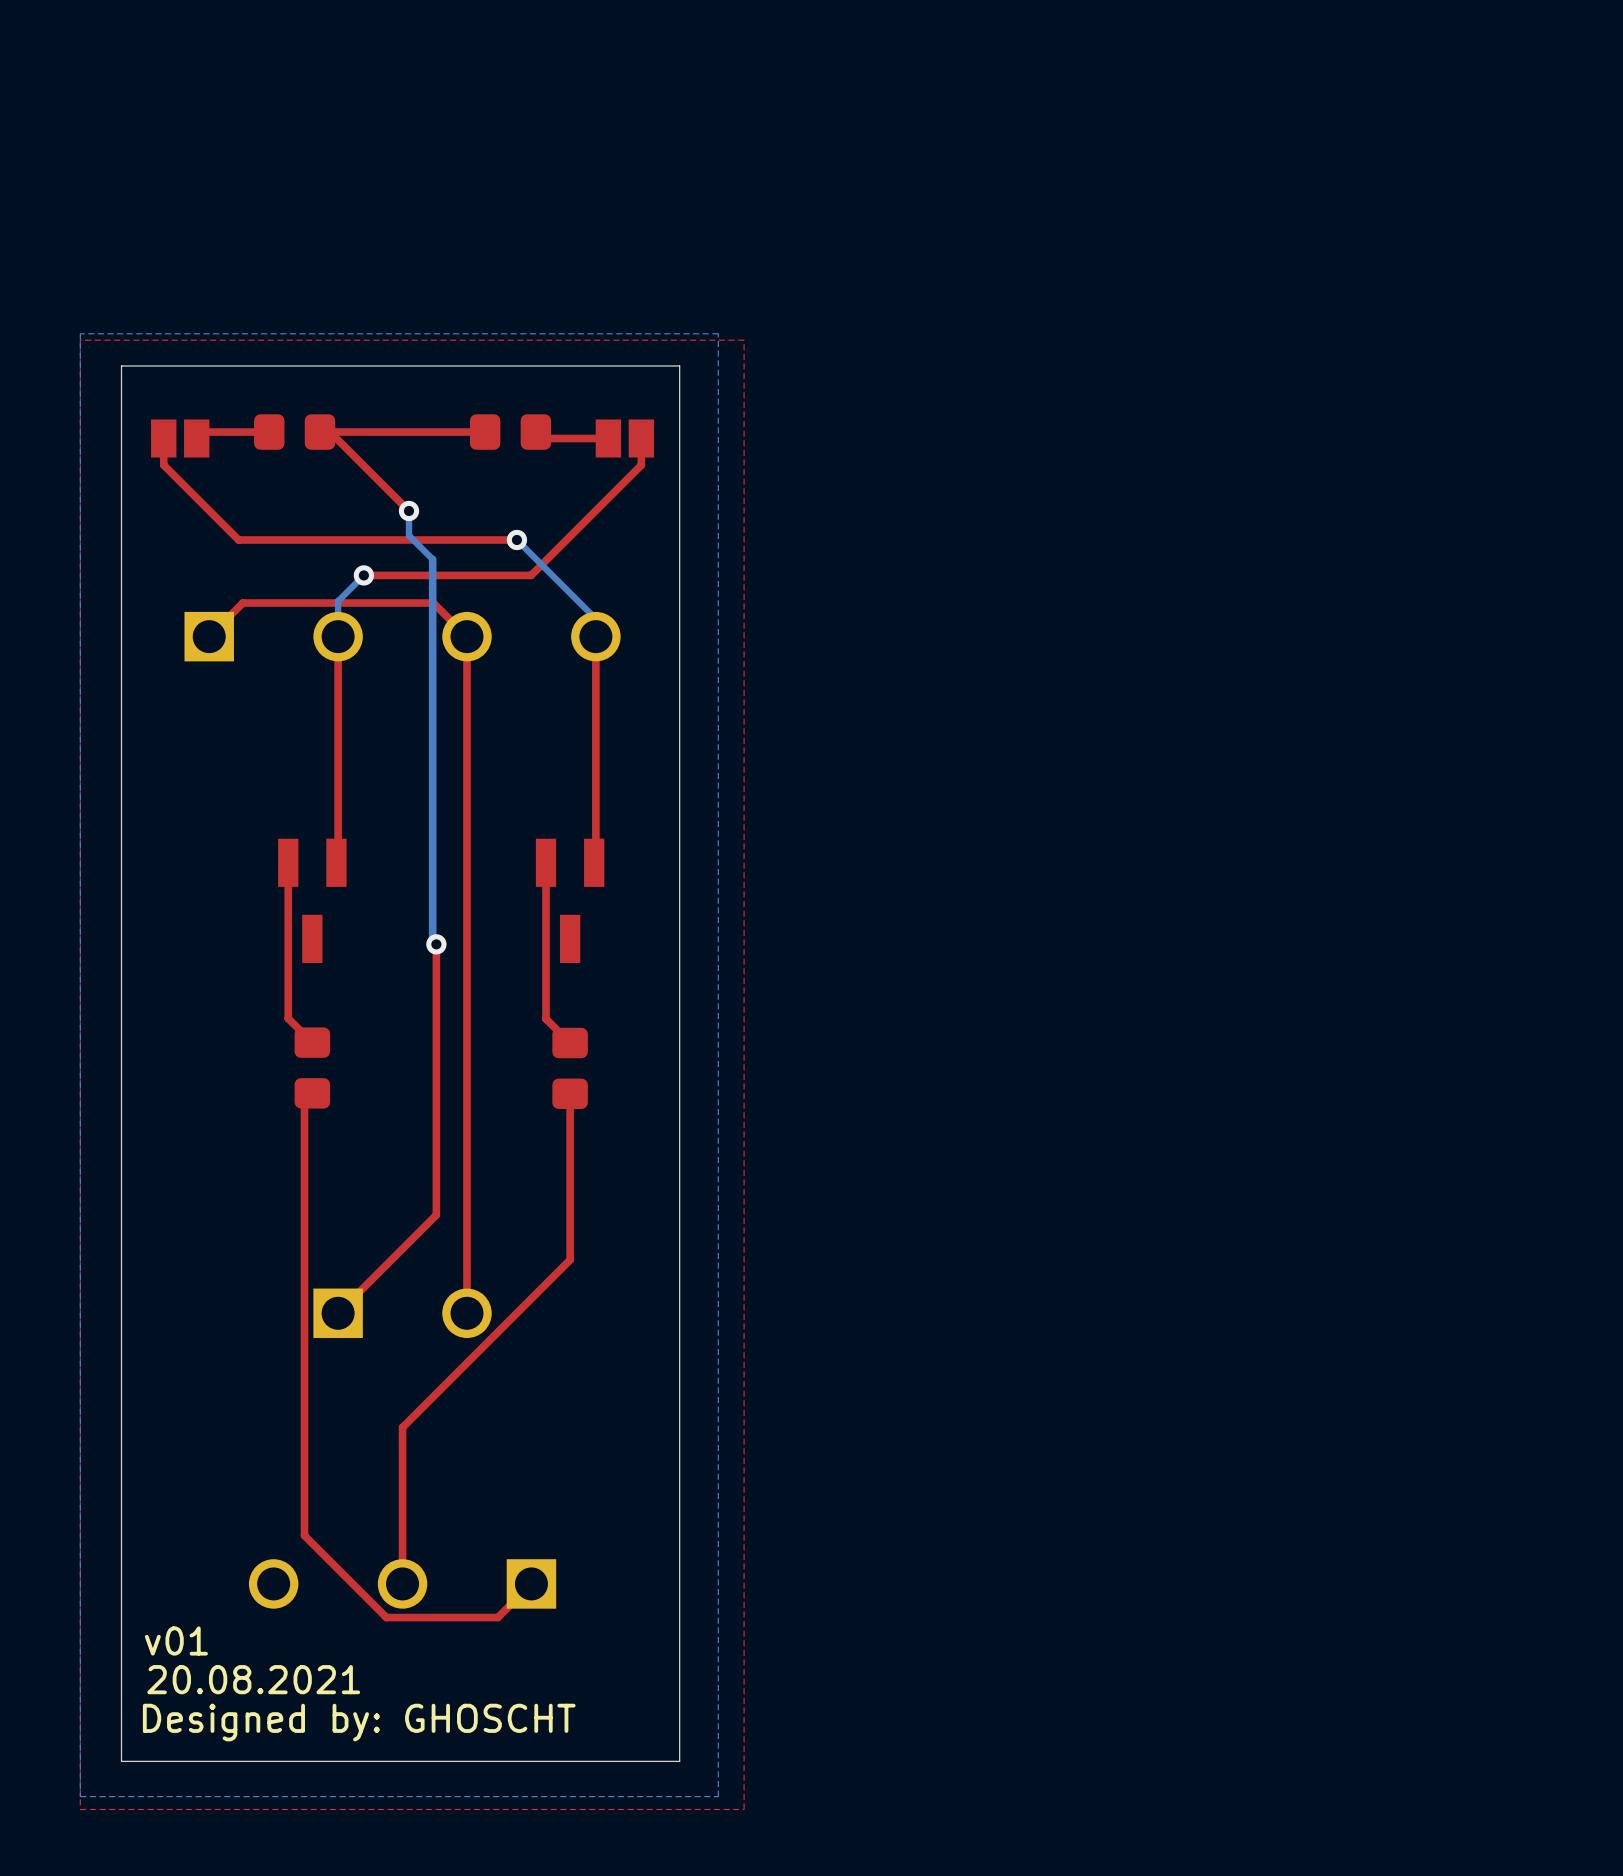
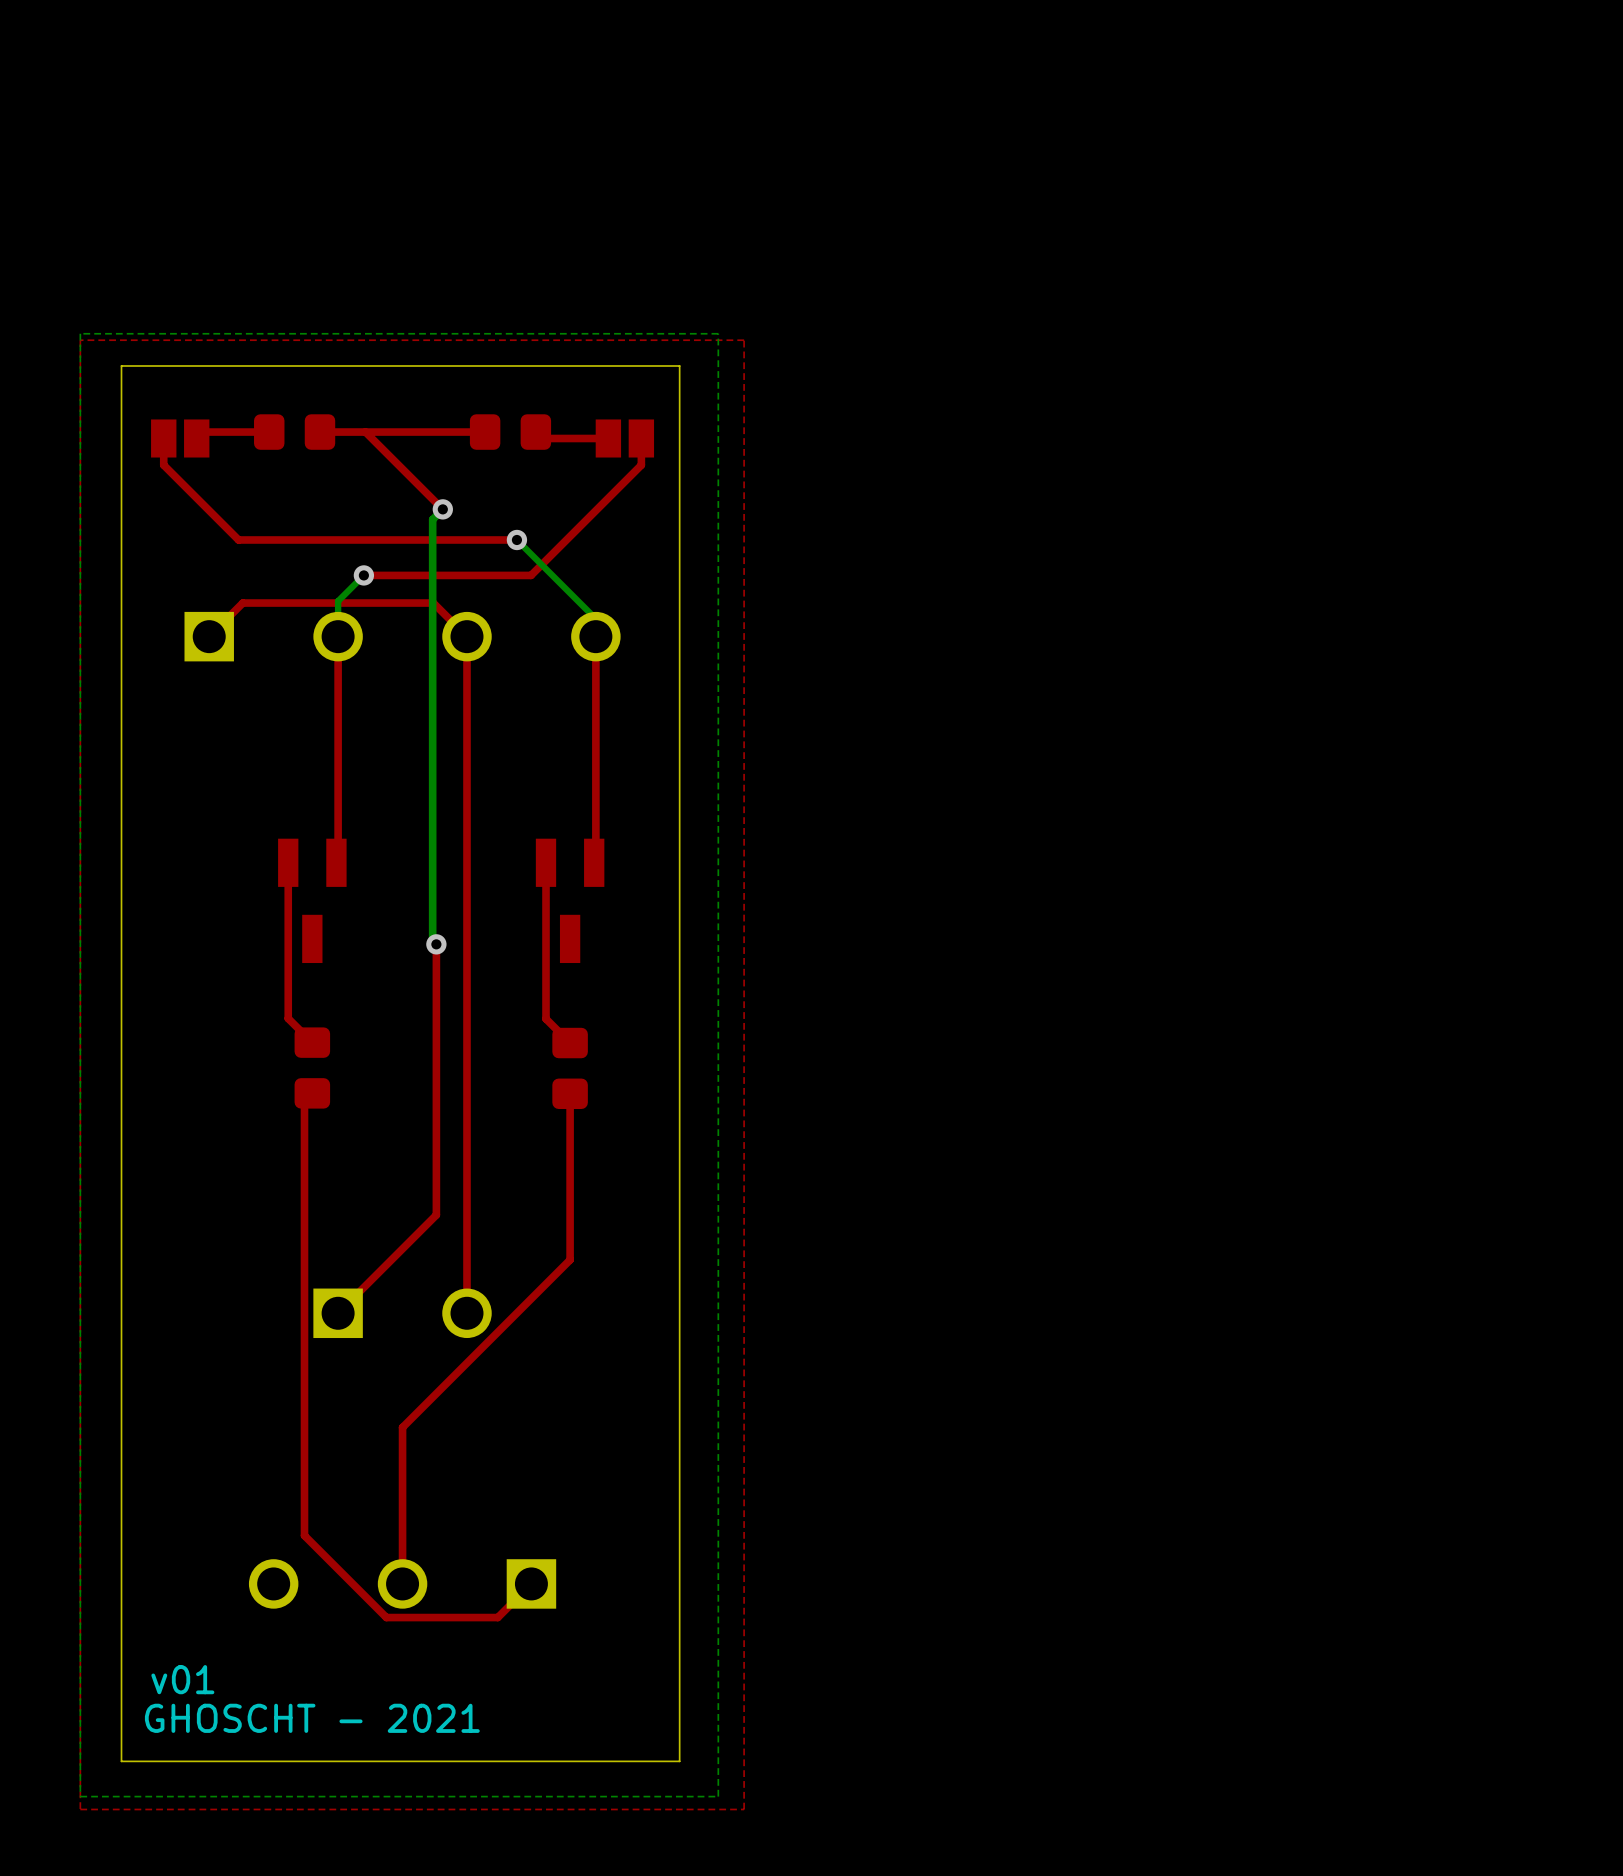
top track: (331, 433) (409, 510) -> (365, 432) (442, 509)
bottom track: (409, 510) (409, 535) (432, 559) -> (442, 509) (432, 519) (432, 559)
via position: (409, 510) -> (442, 509)
text position: v01 (176, 1640) -> v01 (182, 1679)
text: 20.08.2021 (253, 1679) -> none
text: none -> GHOSCHT - 2021 (312, 1718)
text: Designed by: GHOSCHT (359, 1722) -> none

